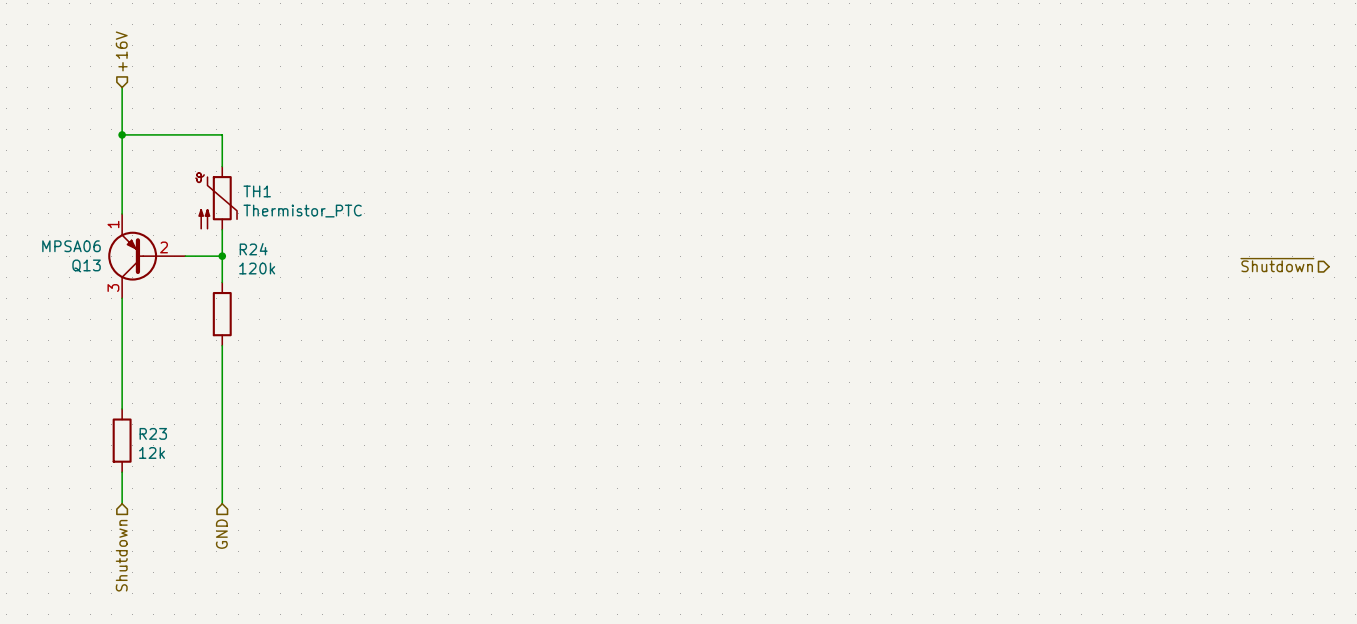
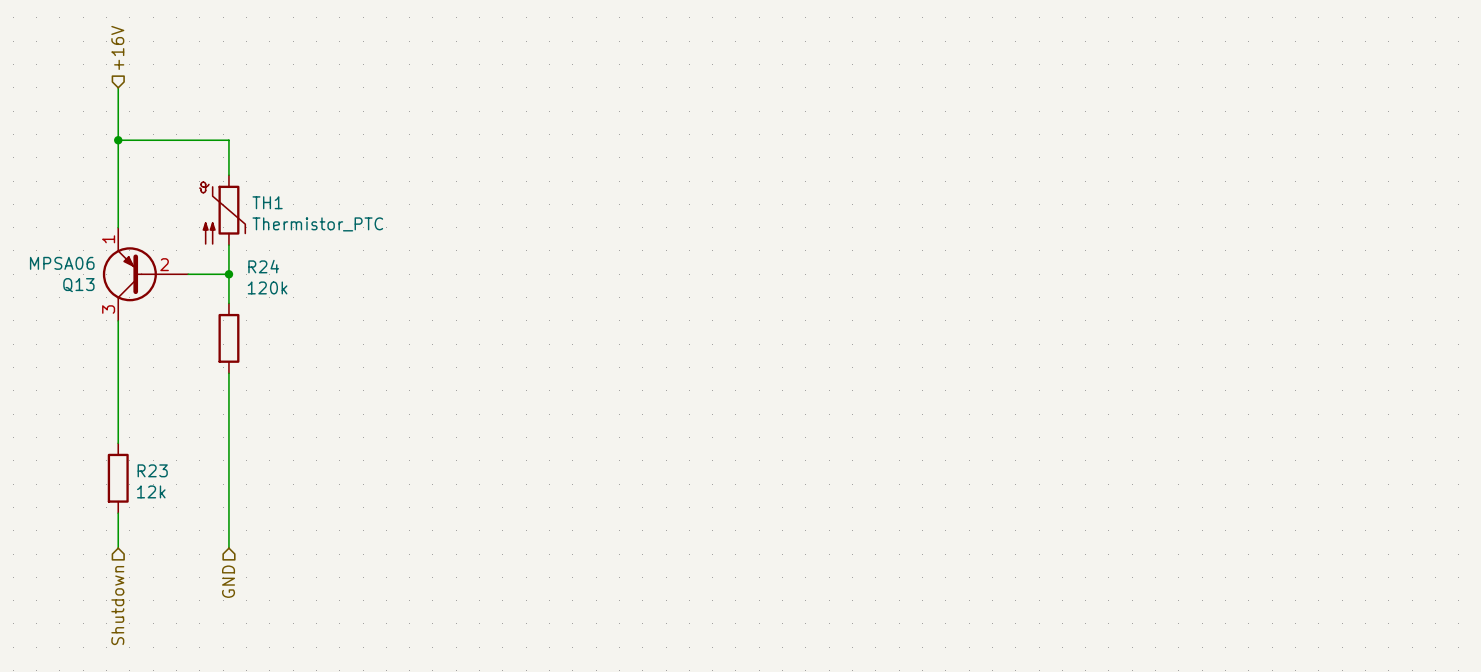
hierarchical label: ~{Shutdown} (1277, 265) -> none

